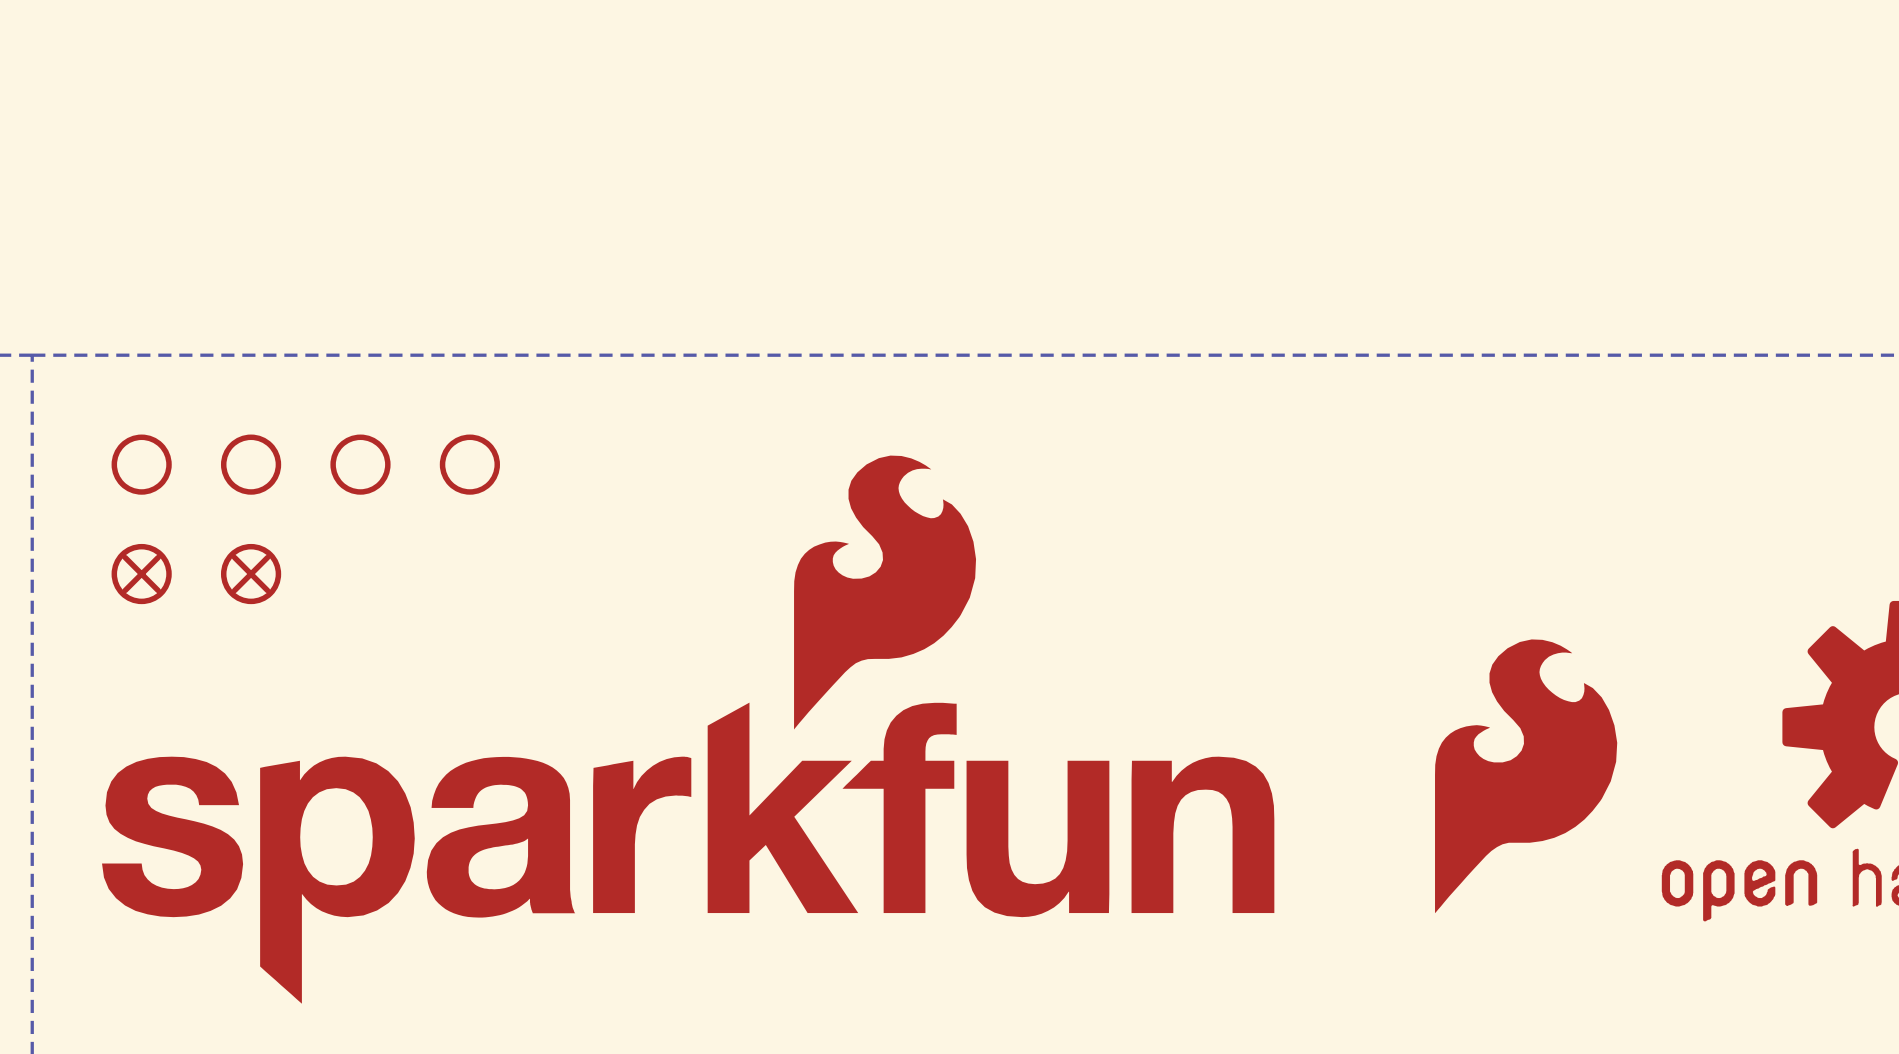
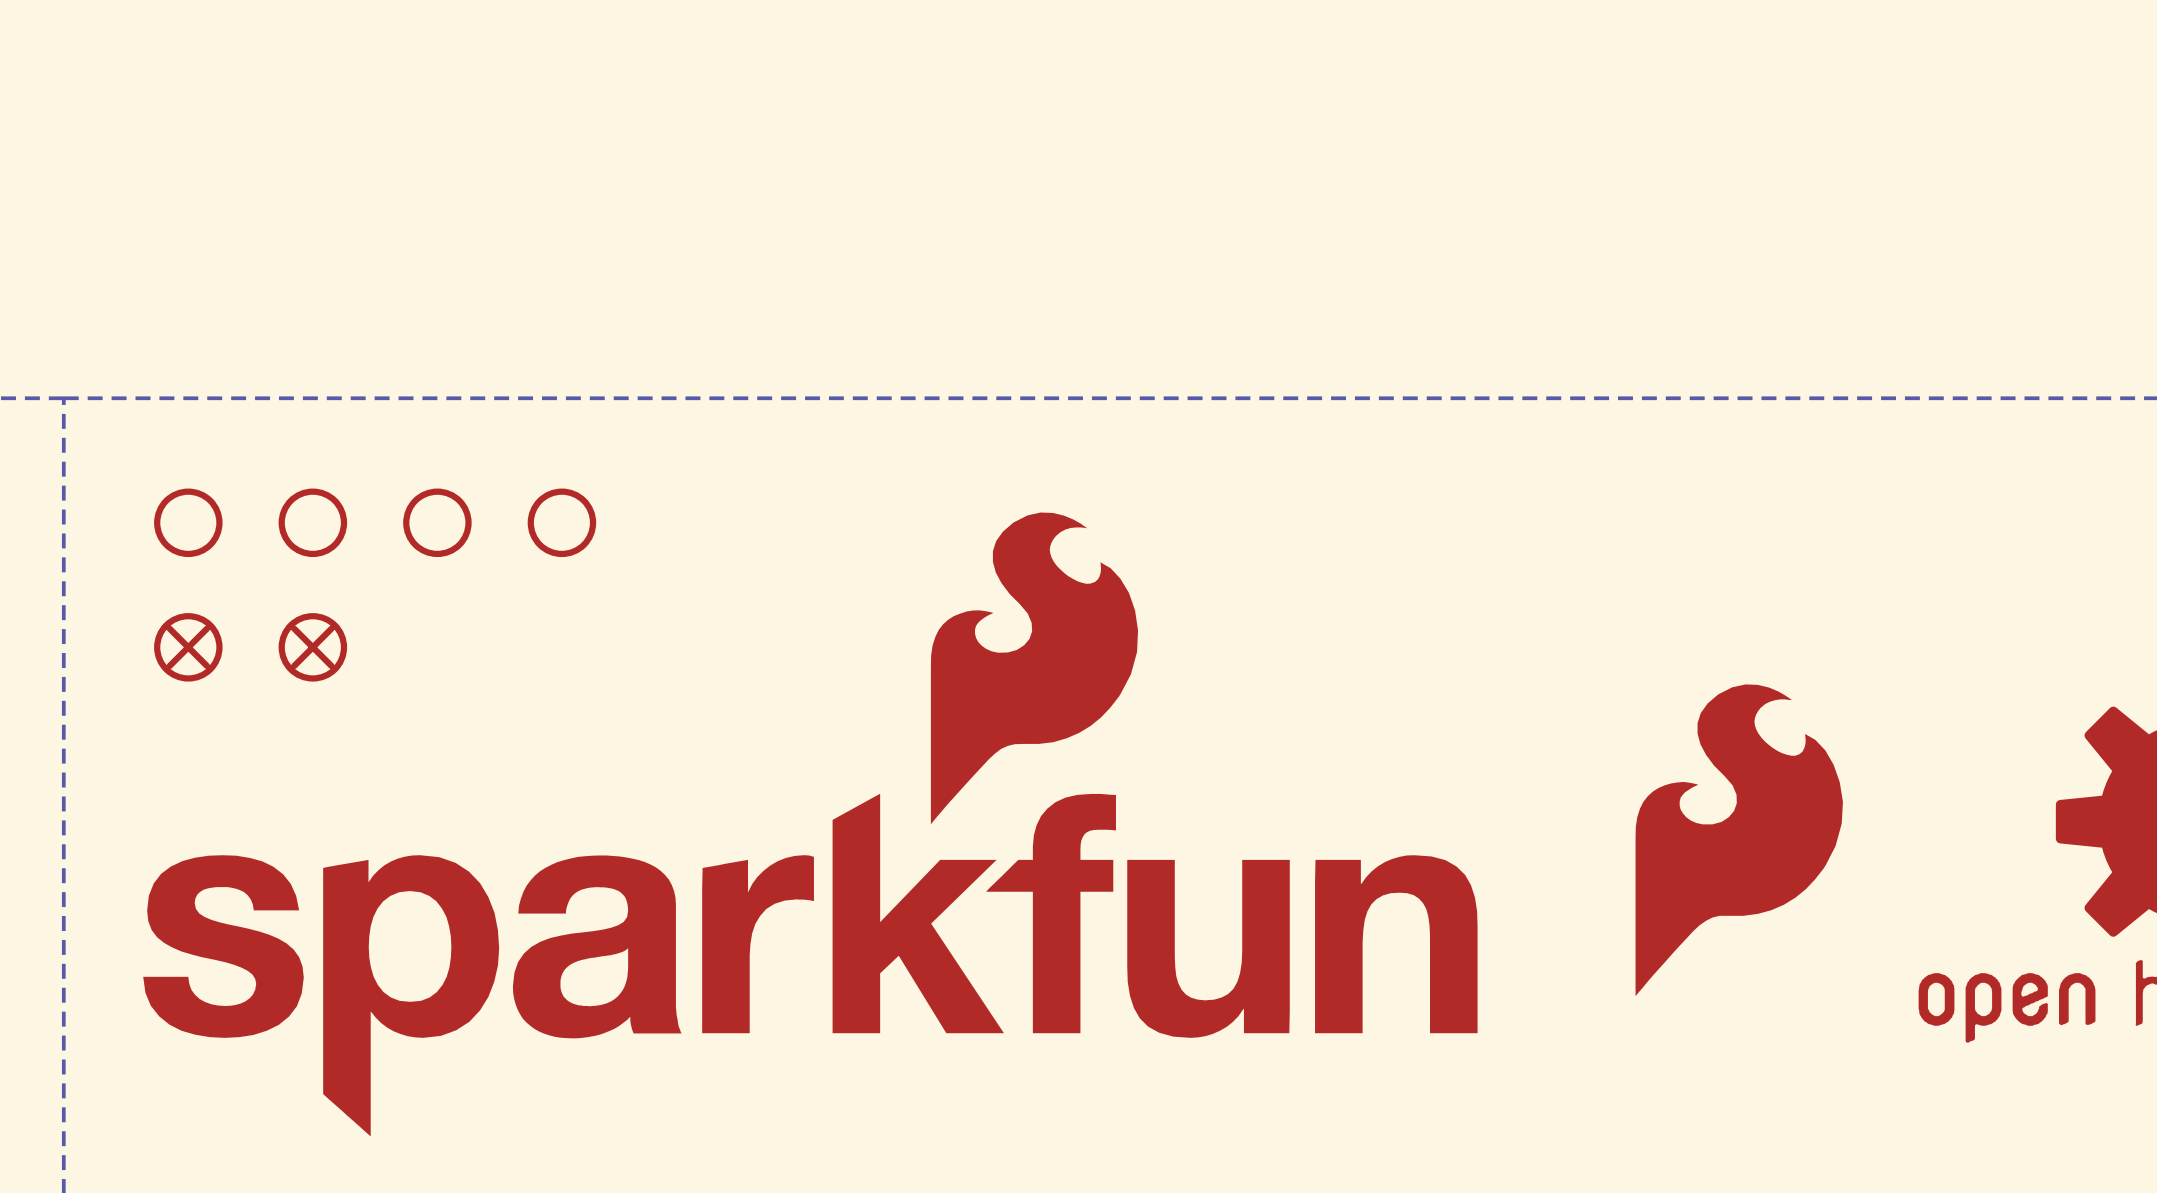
part position: (1526, 776) -> (1739, 840)

